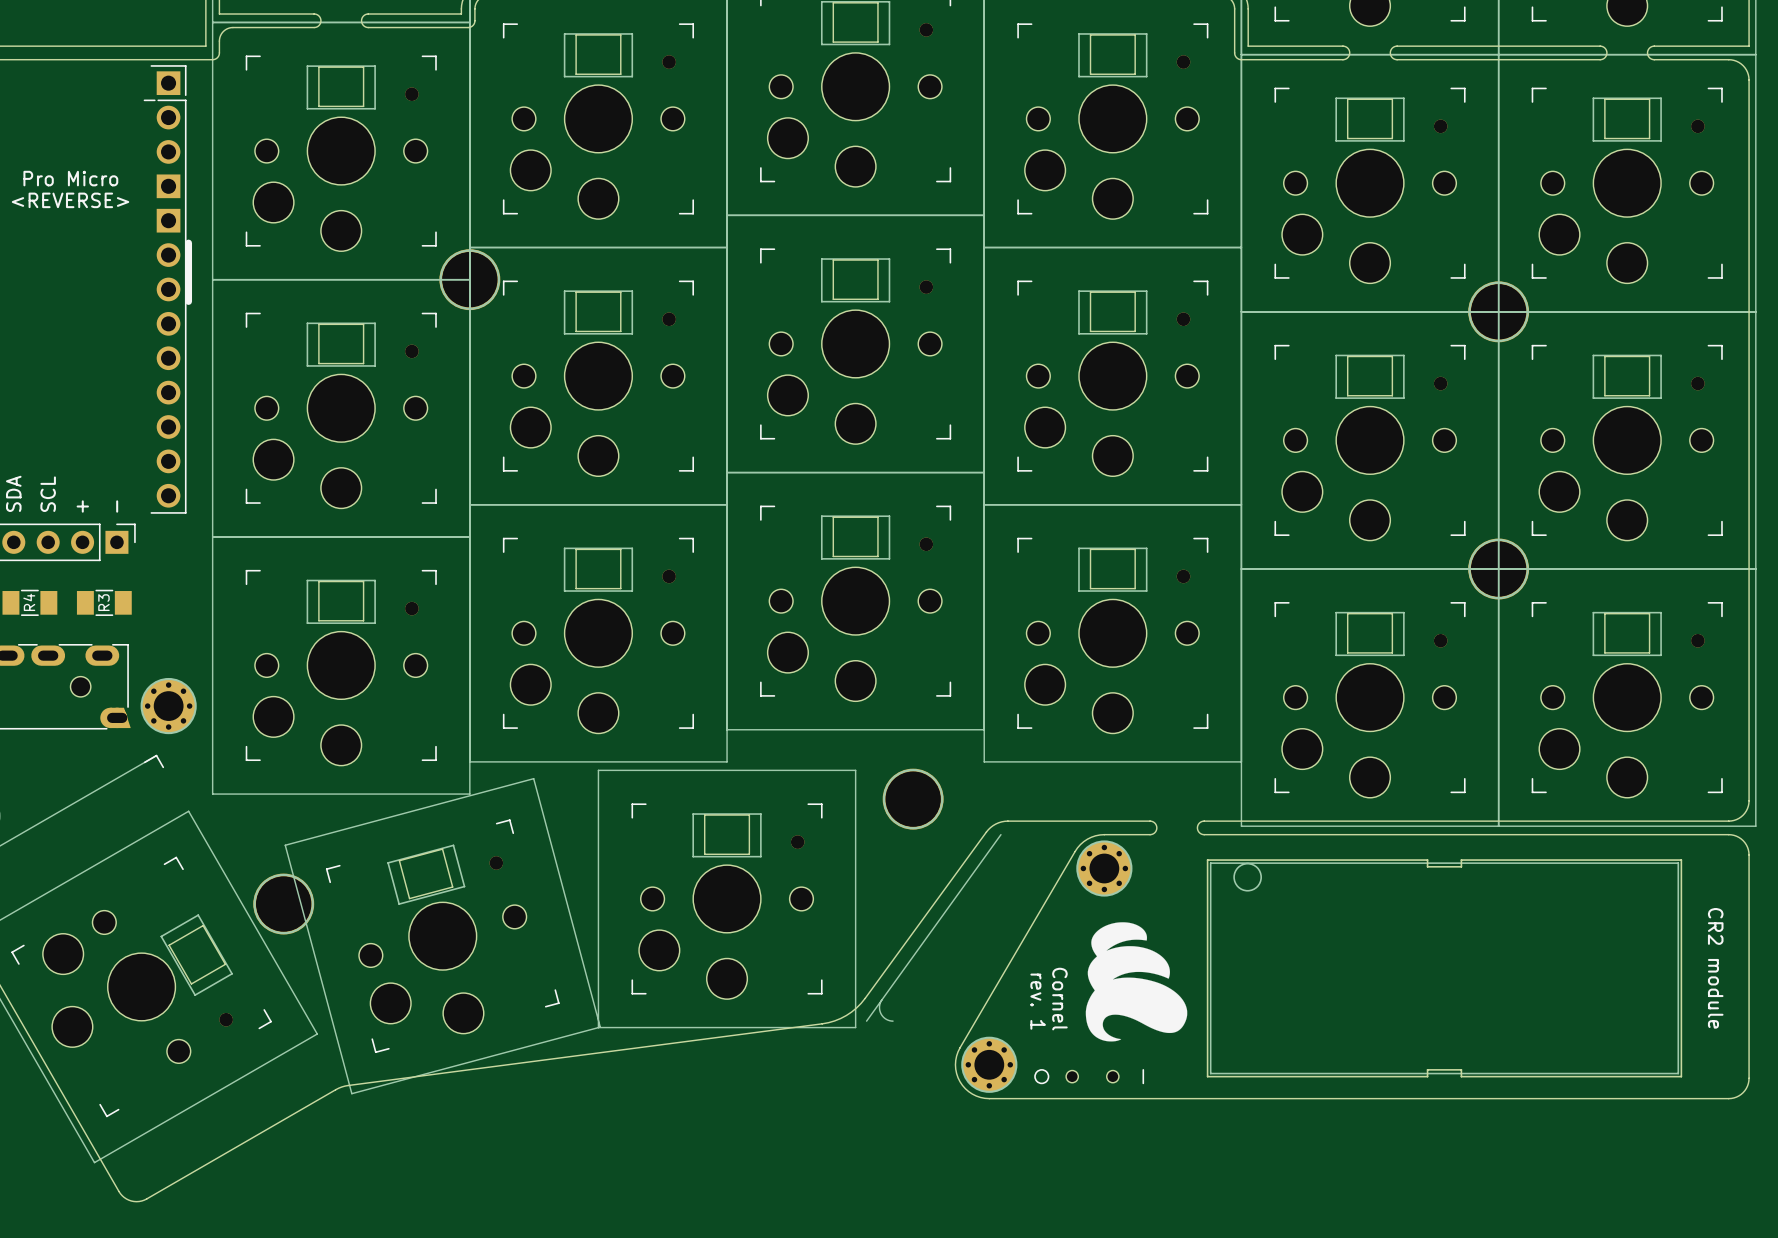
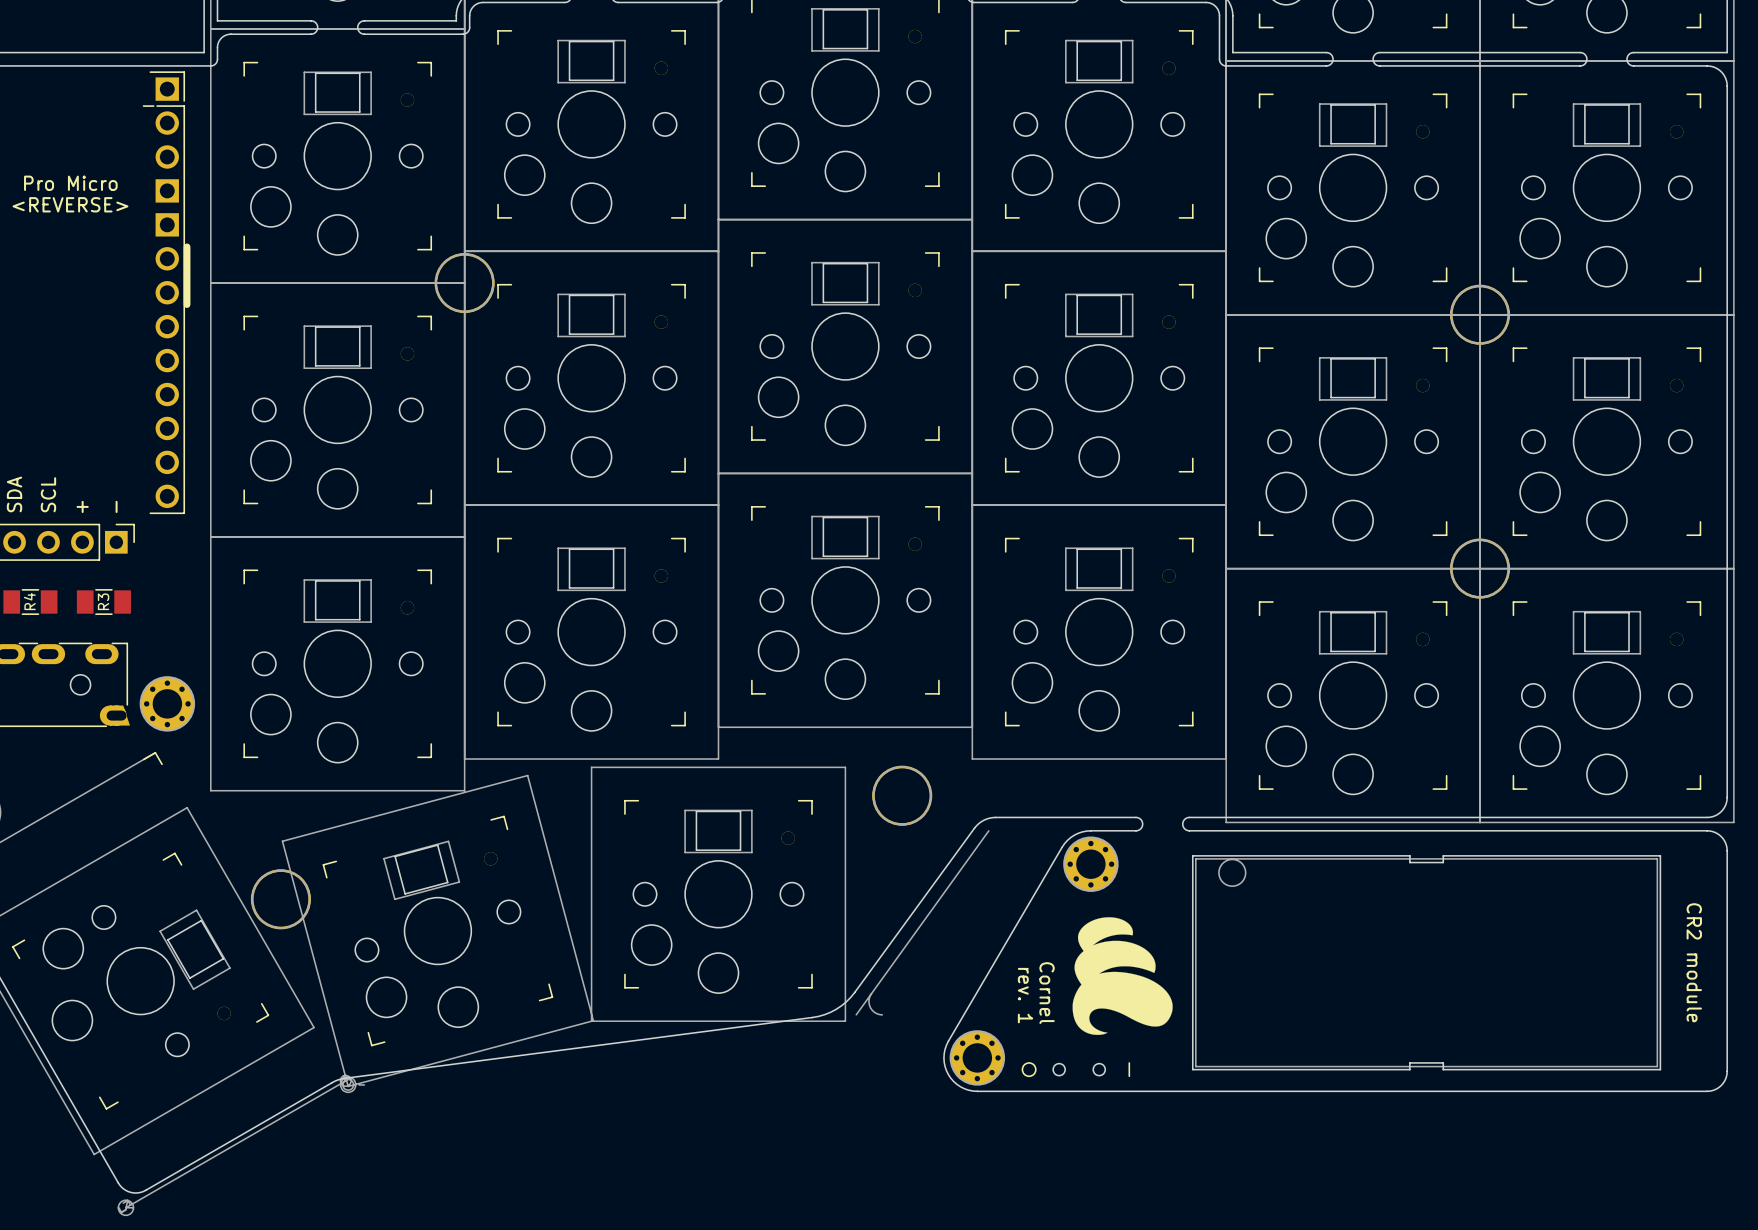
drawing: none -> [340, 1075, 356, 1093]
line: none -> (343, 1076) (345, 1080) (125, 1207)
line: none -> (359, 1084) (364, 1084)
drawing: none -> [118, 1200, 134, 1216]
line: none -> (127, 1200) (125, 1207)
line: none -> (127, 1200) (123, 1203)
line: none -> (127, 1200) (130, 1205)
line: none -> (118, 1207) (121, 1212) (125, 1209)
line: none -> (125, 1207) (133, 1207)

